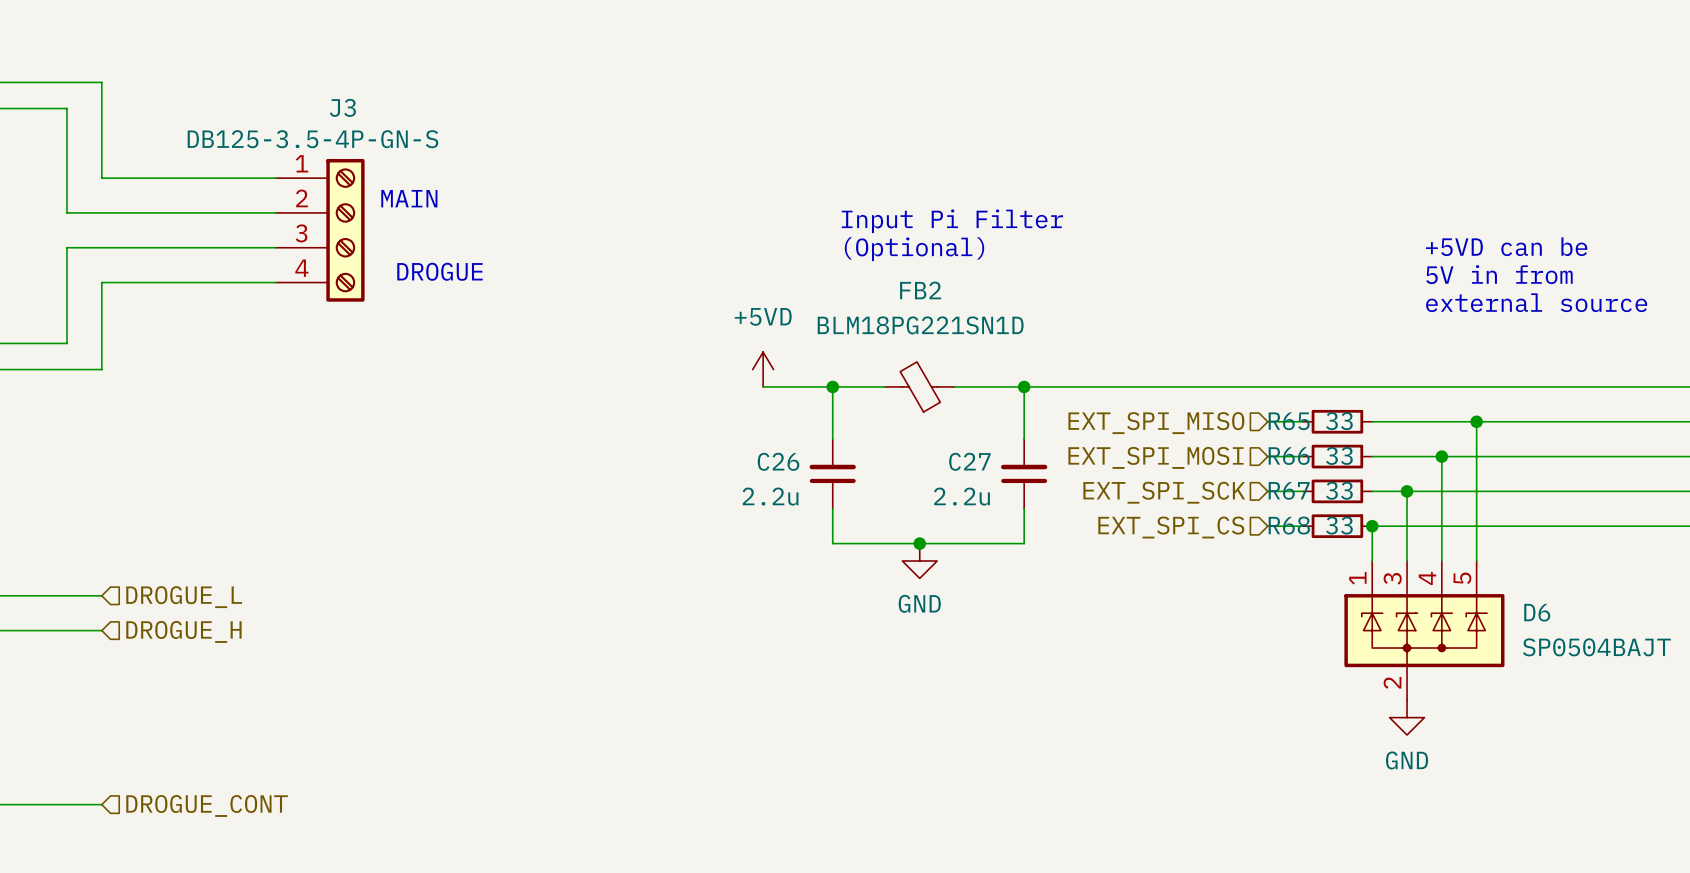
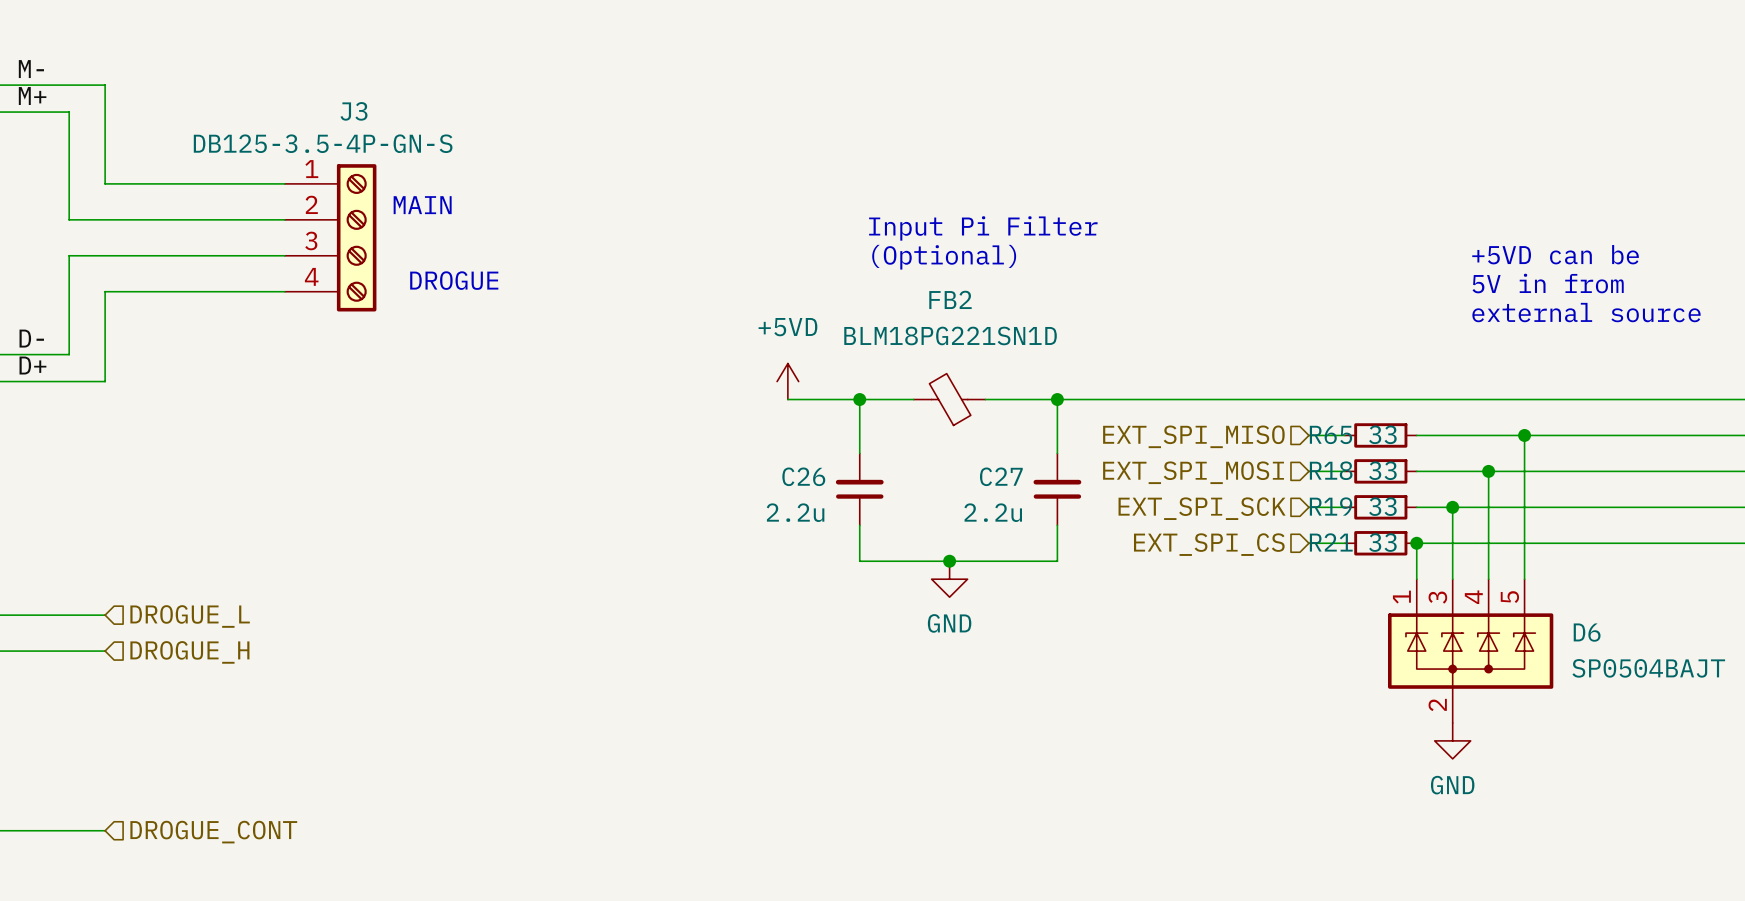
label: none -> M- (31, 69)
label: none -> M+ (32, 96)
label: none -> D- (31, 338)
label: none -> D+ (32, 365)
R66 name: R66 (1289, 456) -> R18 (1331, 470)
R67 name: R67 (1289, 490) -> R19 (1331, 506)
R68 name: R68 (1289, 525) -> R21 (1331, 542)

